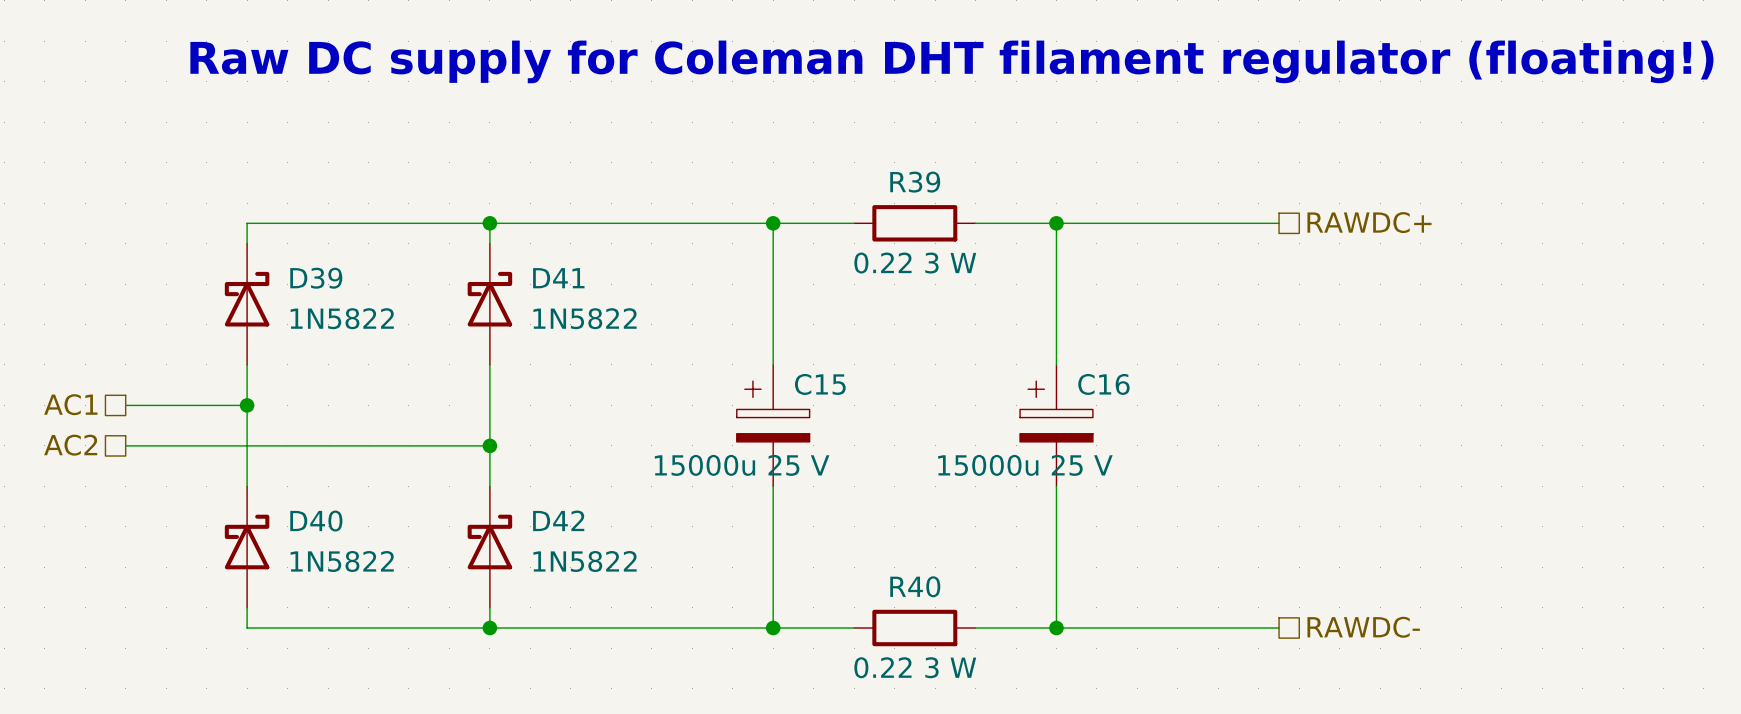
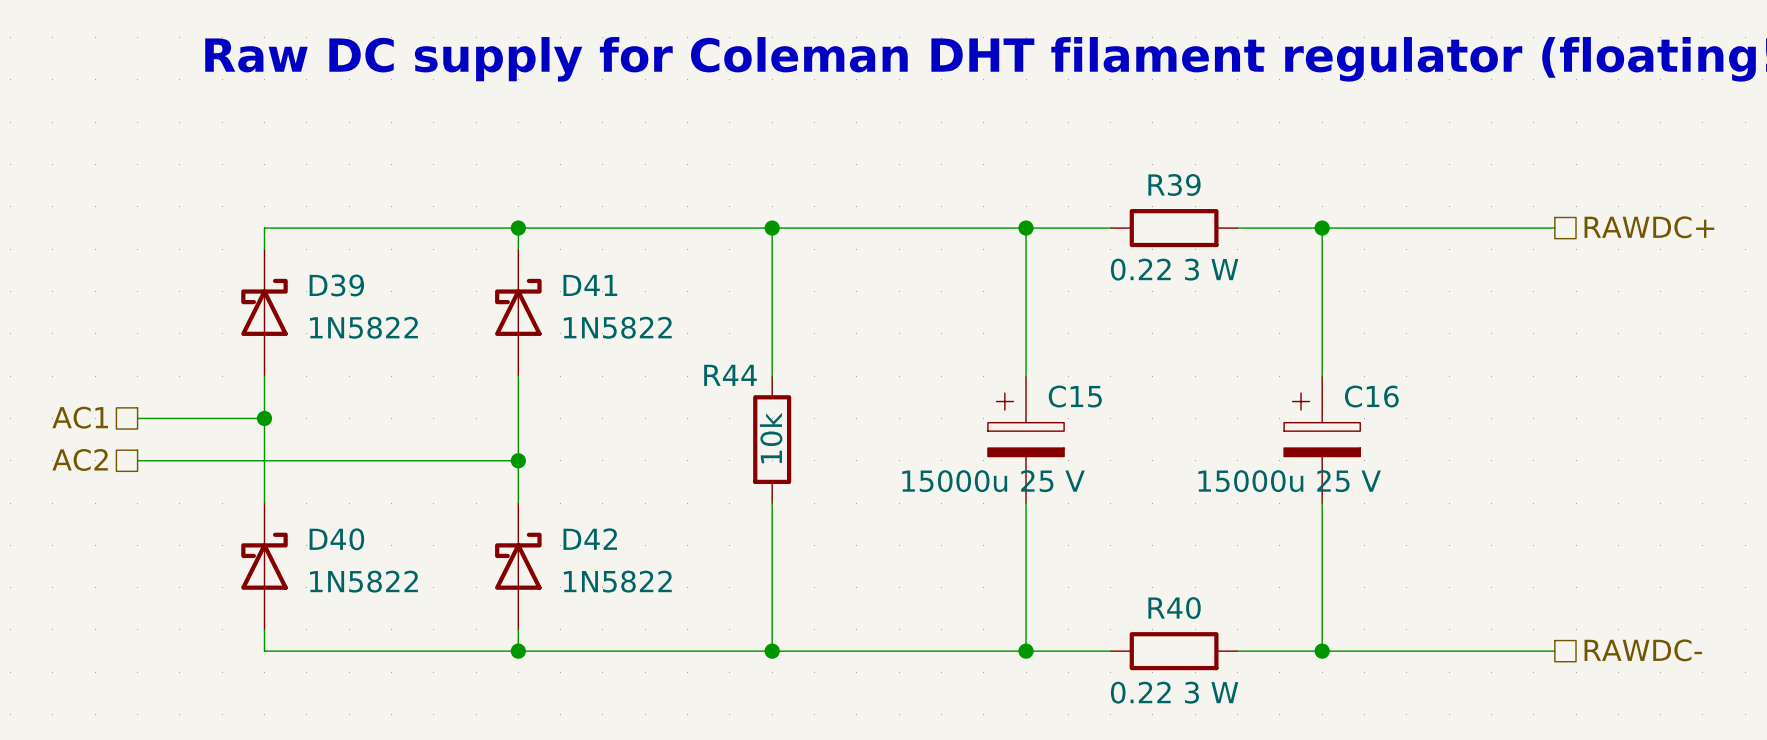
hierarchical label position: RAWDC+ (1369, 222) -> RAWDC+ (1649, 227)
wire: (773, 223) (773, 364) -> (772, 228) (772, 376)
junction position: (773, 223) -> (772, 228)
wire: none -> (899, 228) (1026, 228) (1026, 376)
R39 position: (914, 223) -> (1174, 228)
junction position: (1056, 223) -> (1026, 228)
wire: (1177, 223) (1056, 223) (1056, 364) -> none
wire: none -> (1322, 228) (1322, 376)
junction: none -> (1322, 228)
wire: none -> (1343, 228) (1554, 228)
R44: none -> 10k (772, 439)
C15 position: (773, 425) -> (1026, 439)
C16 position: (1056, 425) -> (1322, 439)
wire: (773, 486) (773, 628) -> (772, 503) (772, 651)
wire: none -> (1026, 503) (1026, 651) (899, 651)
wire: (1056, 486) (1056, 628) (1177, 628) -> none
wire: none -> (1322, 503) (1322, 651)
hierarchical label position: RAWDC- (1363, 627) -> RAWDC- (1643, 650)
junction position: (773, 628) -> (772, 651)
R40 position: (914, 628) -> (1174, 651)
junction position: (1056, 628) -> (1026, 651)
junction: none -> (1322, 651)
wire: none -> (1343, 651) (1554, 651)

